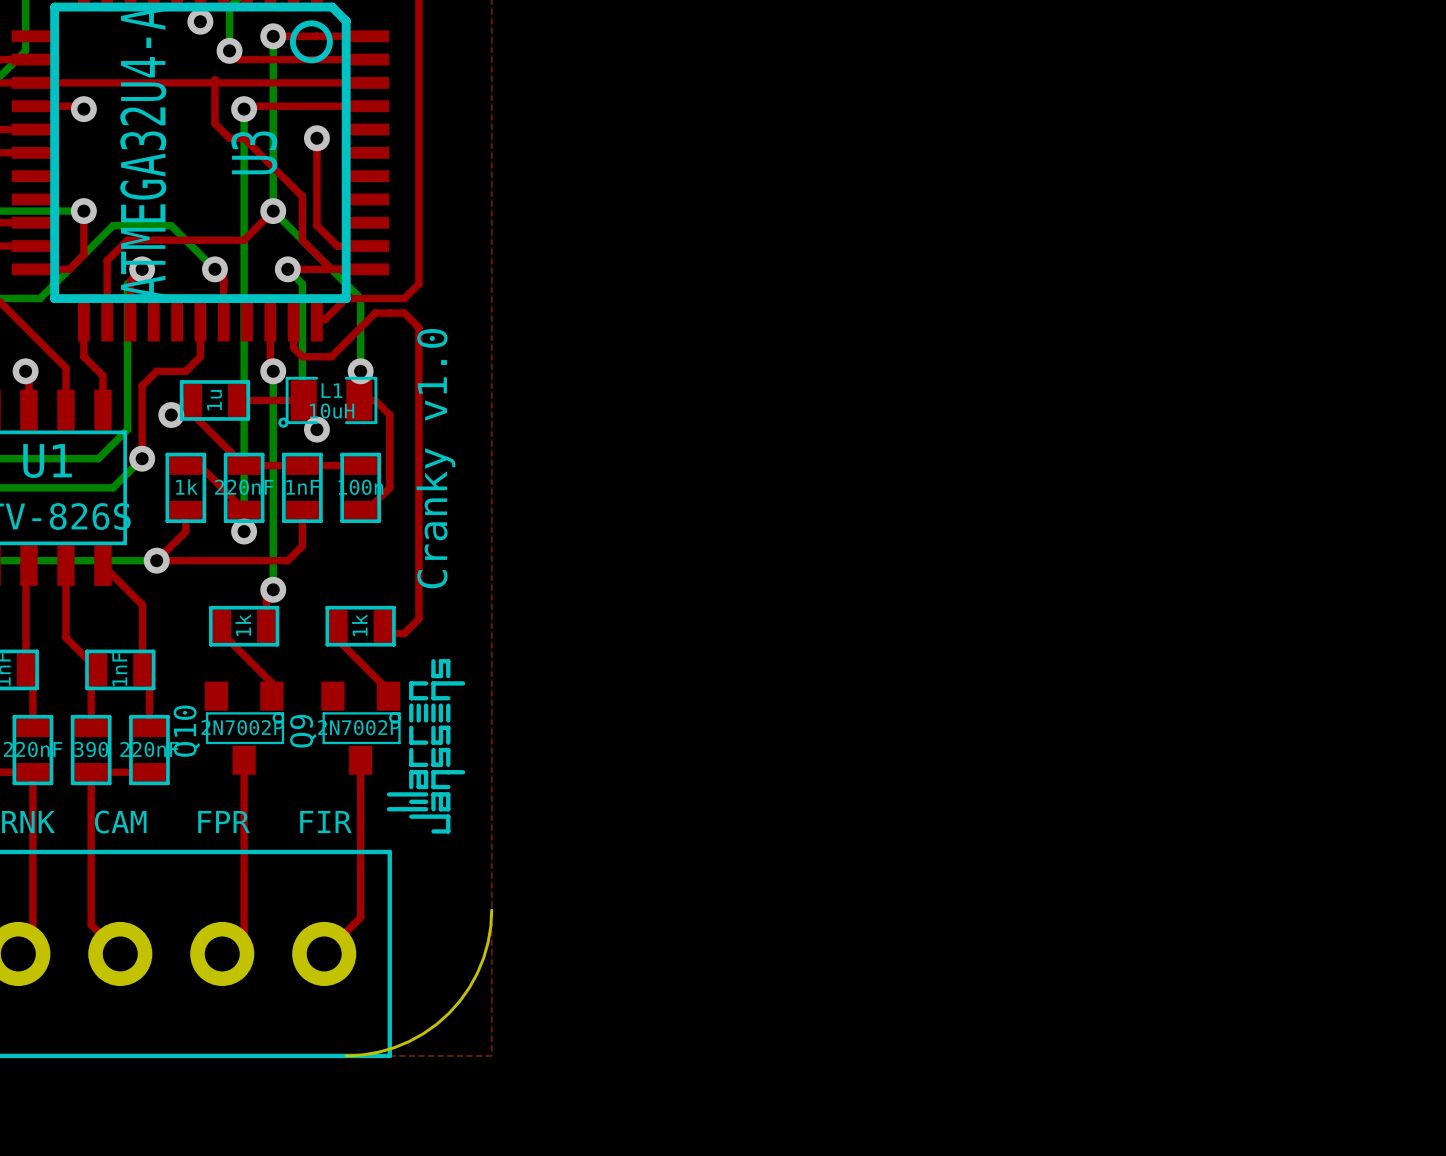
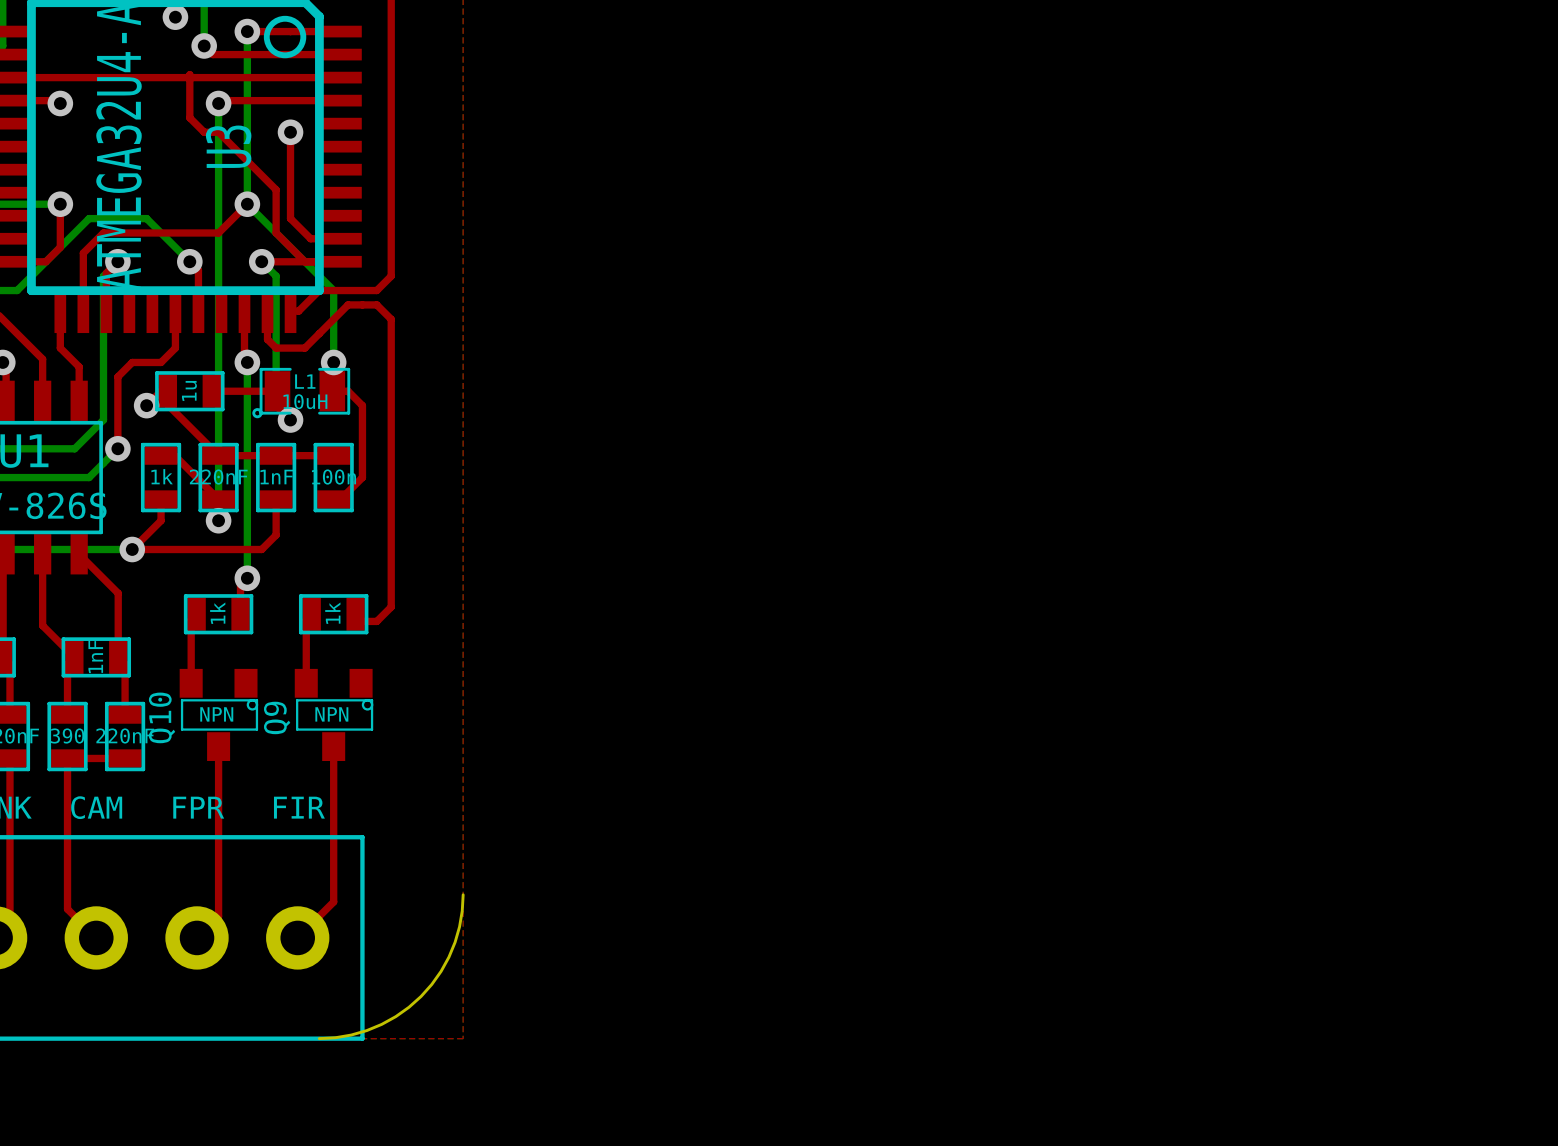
text: Cranky v1.0 (435, 458) -> none
top track: (221, 626) (221, 633) (271, 683) (271, 696) -> (196, 614) (191, 619) (191, 683)
top track: (338, 626) (338, 640) (388, 690) (388, 696) -> (311, 614) (306, 619) (306, 683)
drawing: [386, 659, 466, 834] -> none
Q10 value: 2N7002P (242, 727) -> NPN (216, 714)
Q9 value: 2N7002P (359, 727) -> NPN (331, 714)

